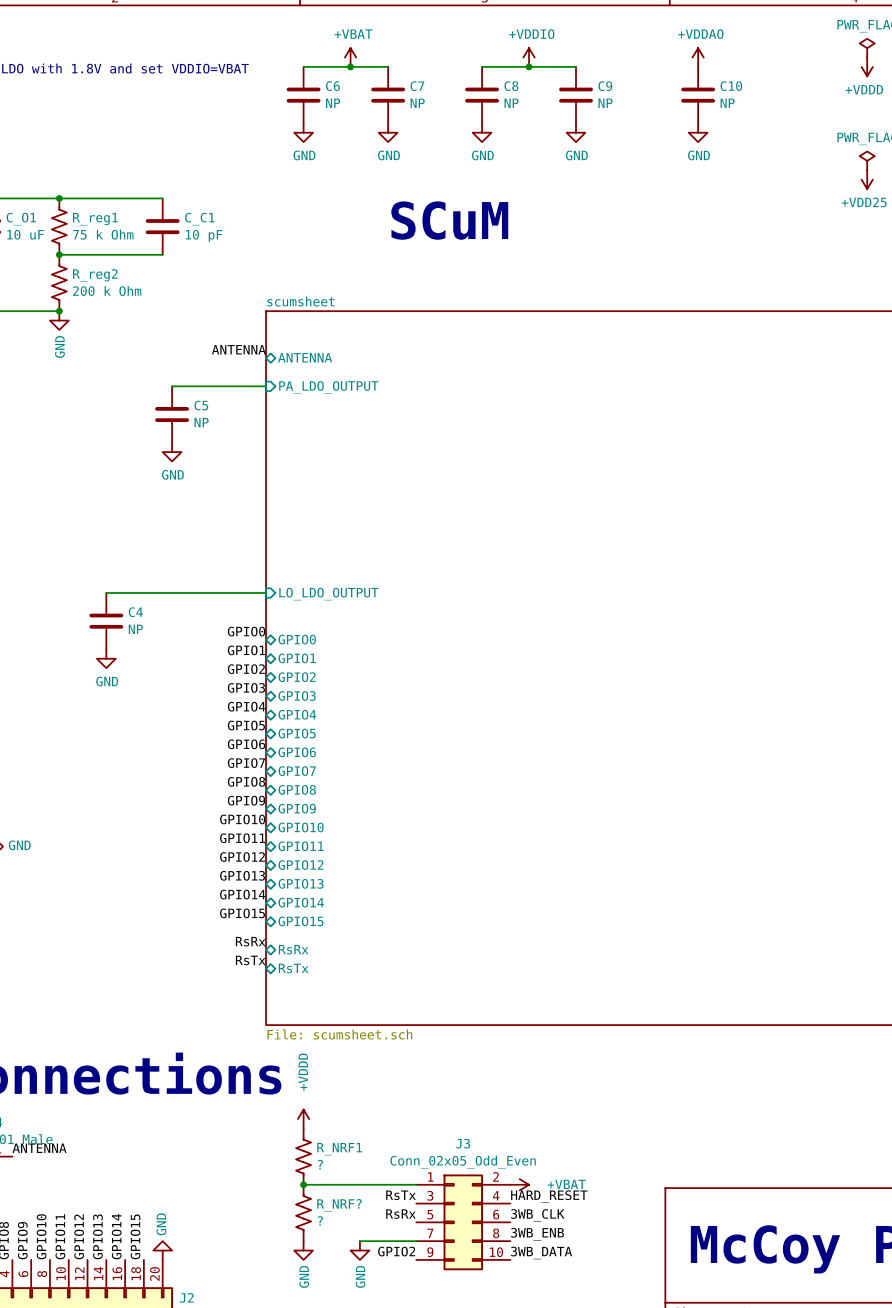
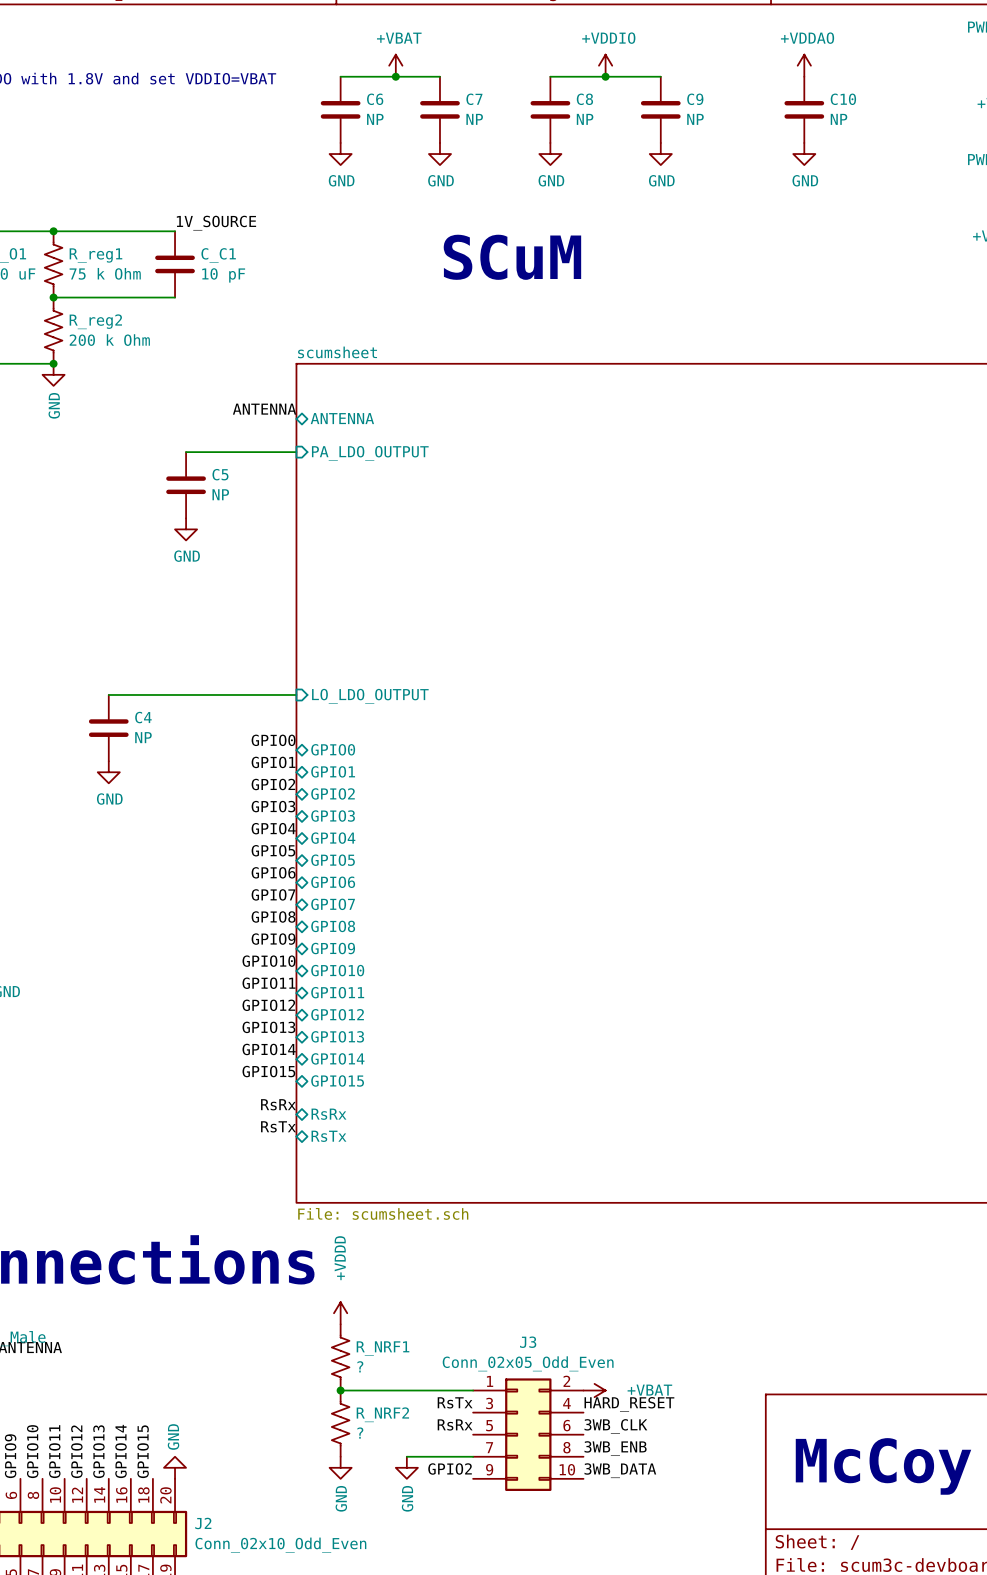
label: none -> 1V_SOURCE (216, 223)
R_NRF? name: R_NRF? (339, 1205) -> R_NRF2 (382, 1414)

